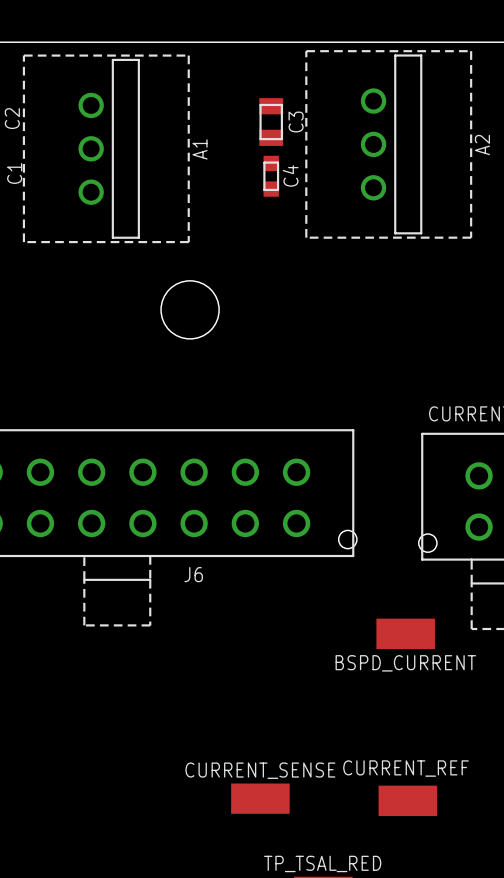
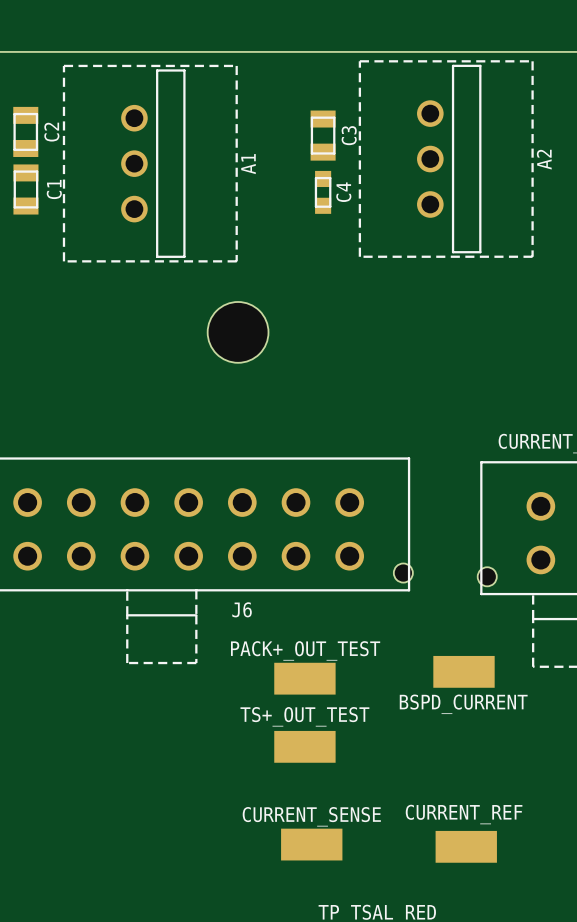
PACK+_OUT_TEST: none -> (304, 678)
TS+_OUT_TEST: none -> (304, 746)

